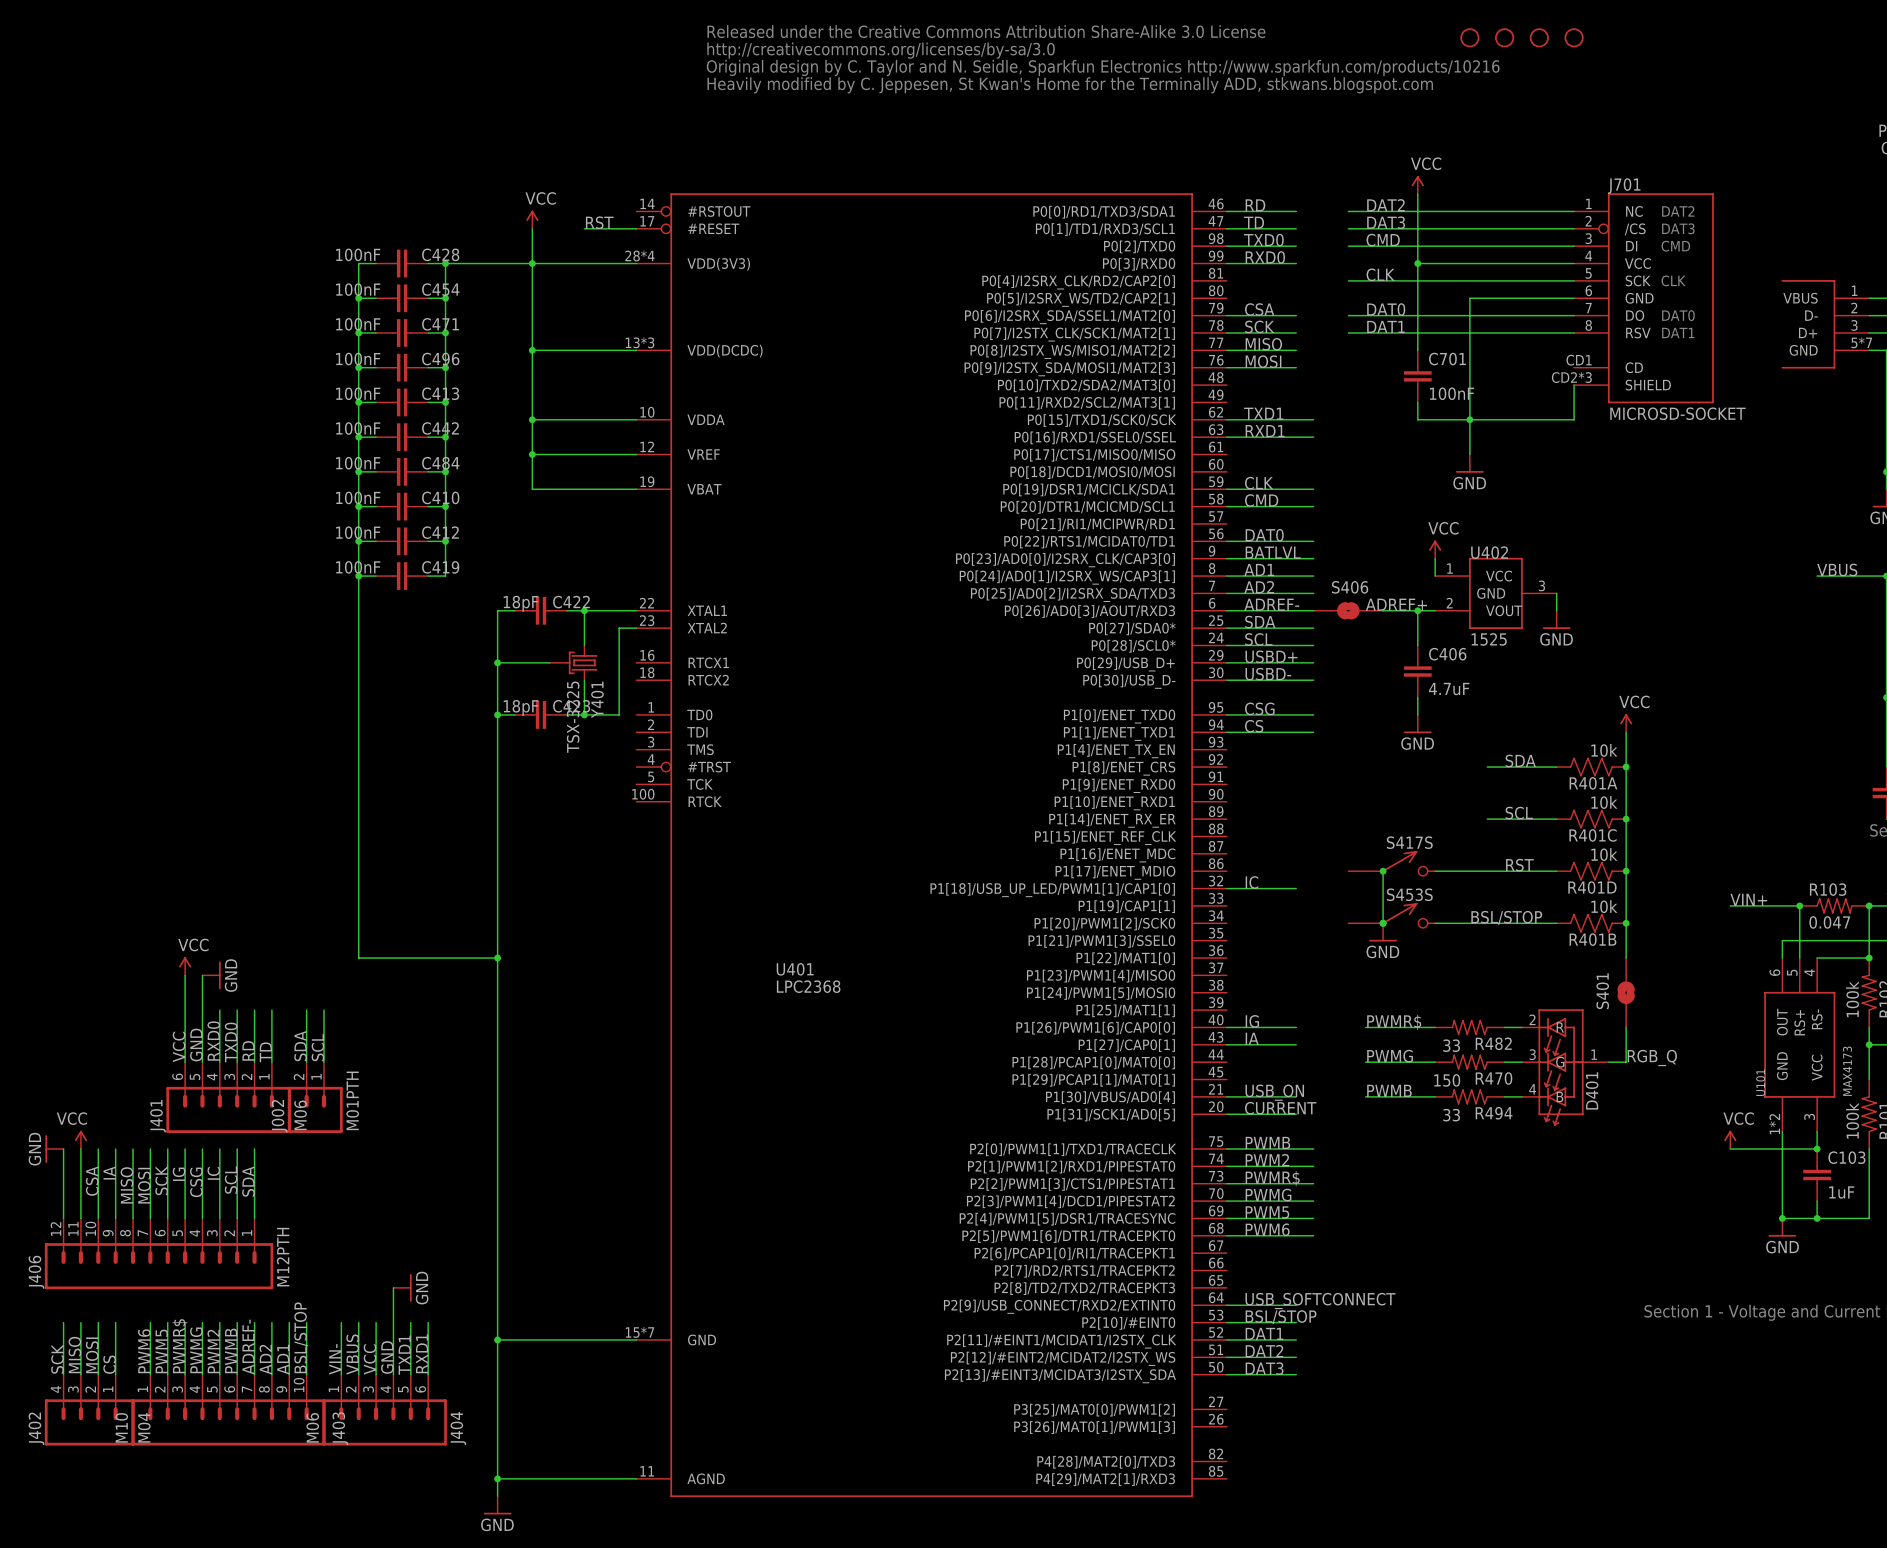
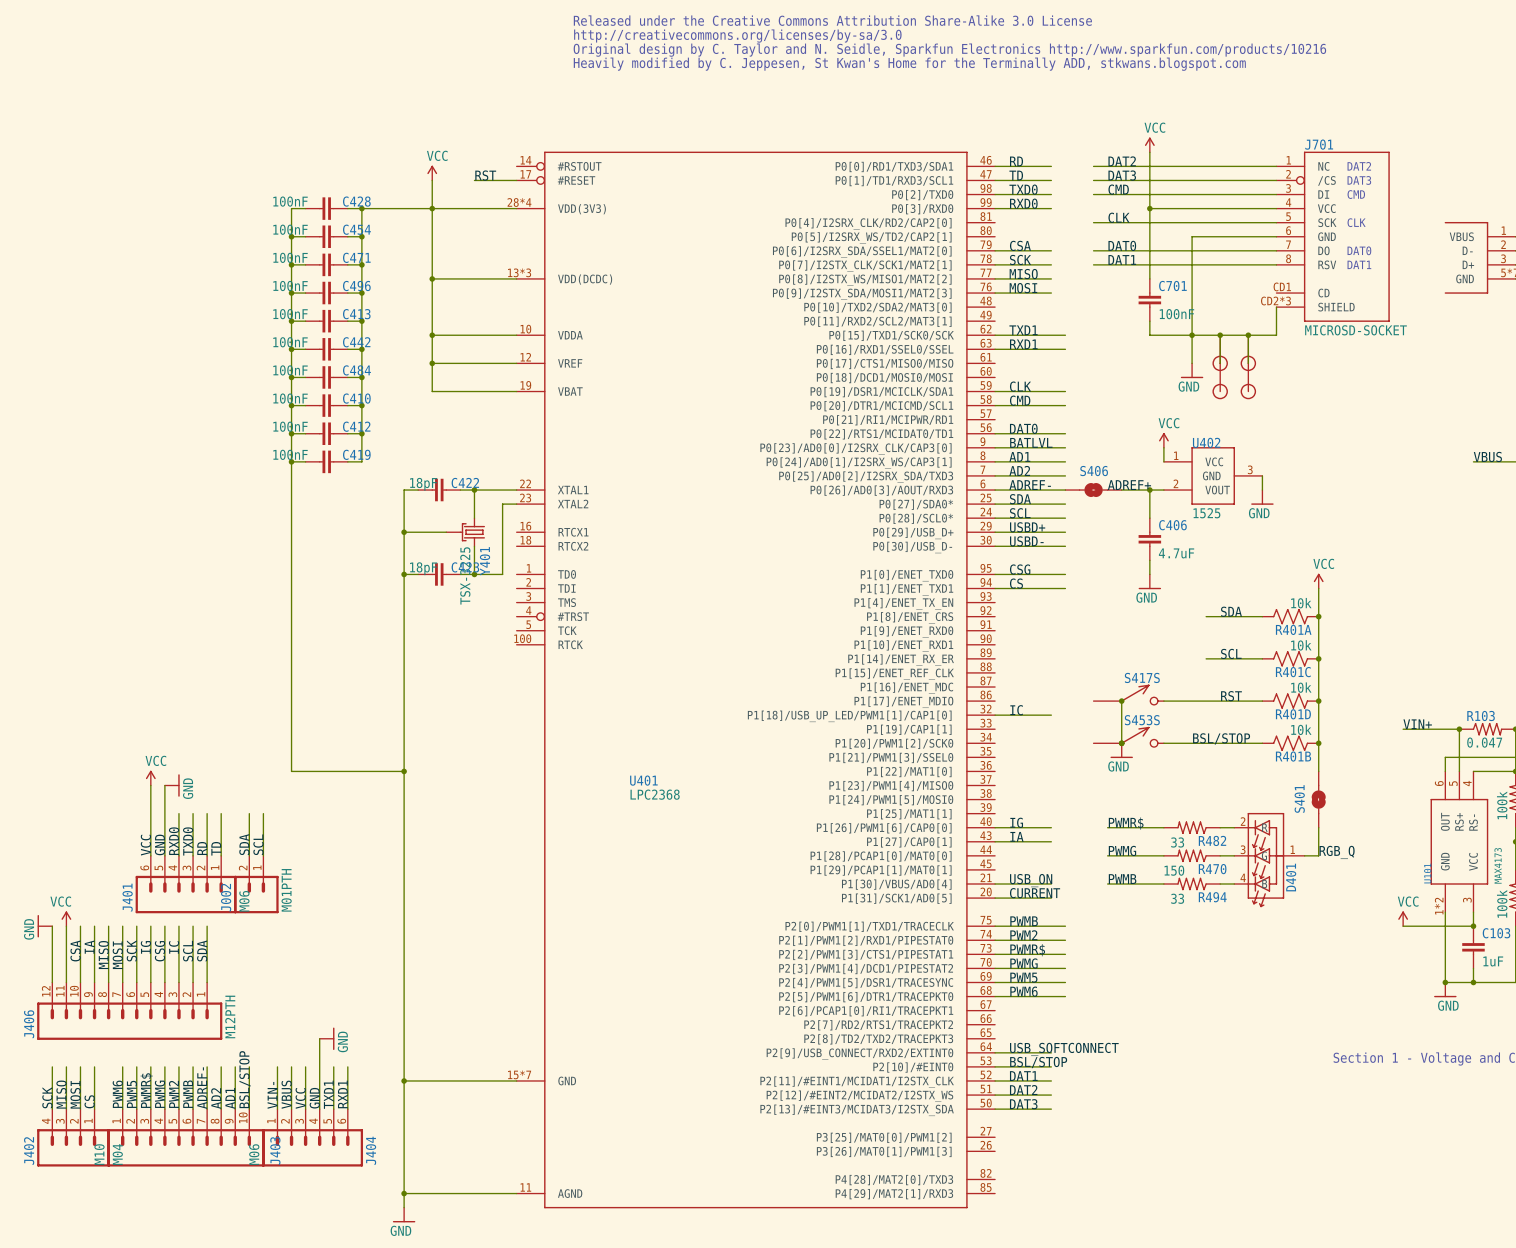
part: (1469, 37) -> none
part: (1504, 37) -> none
part: (1539, 37) -> none
part: (1574, 37) -> none
wire: none -> (1220, 335) (1220, 363)
junction: none -> (1220, 335)
wire: none -> (1248, 335) (1248, 363)
junction: none -> (1248, 335)
part: none -> (1220, 353)
part: none -> (1248, 353)
part: none -> (1220, 381)
part: none -> (1248, 381)

